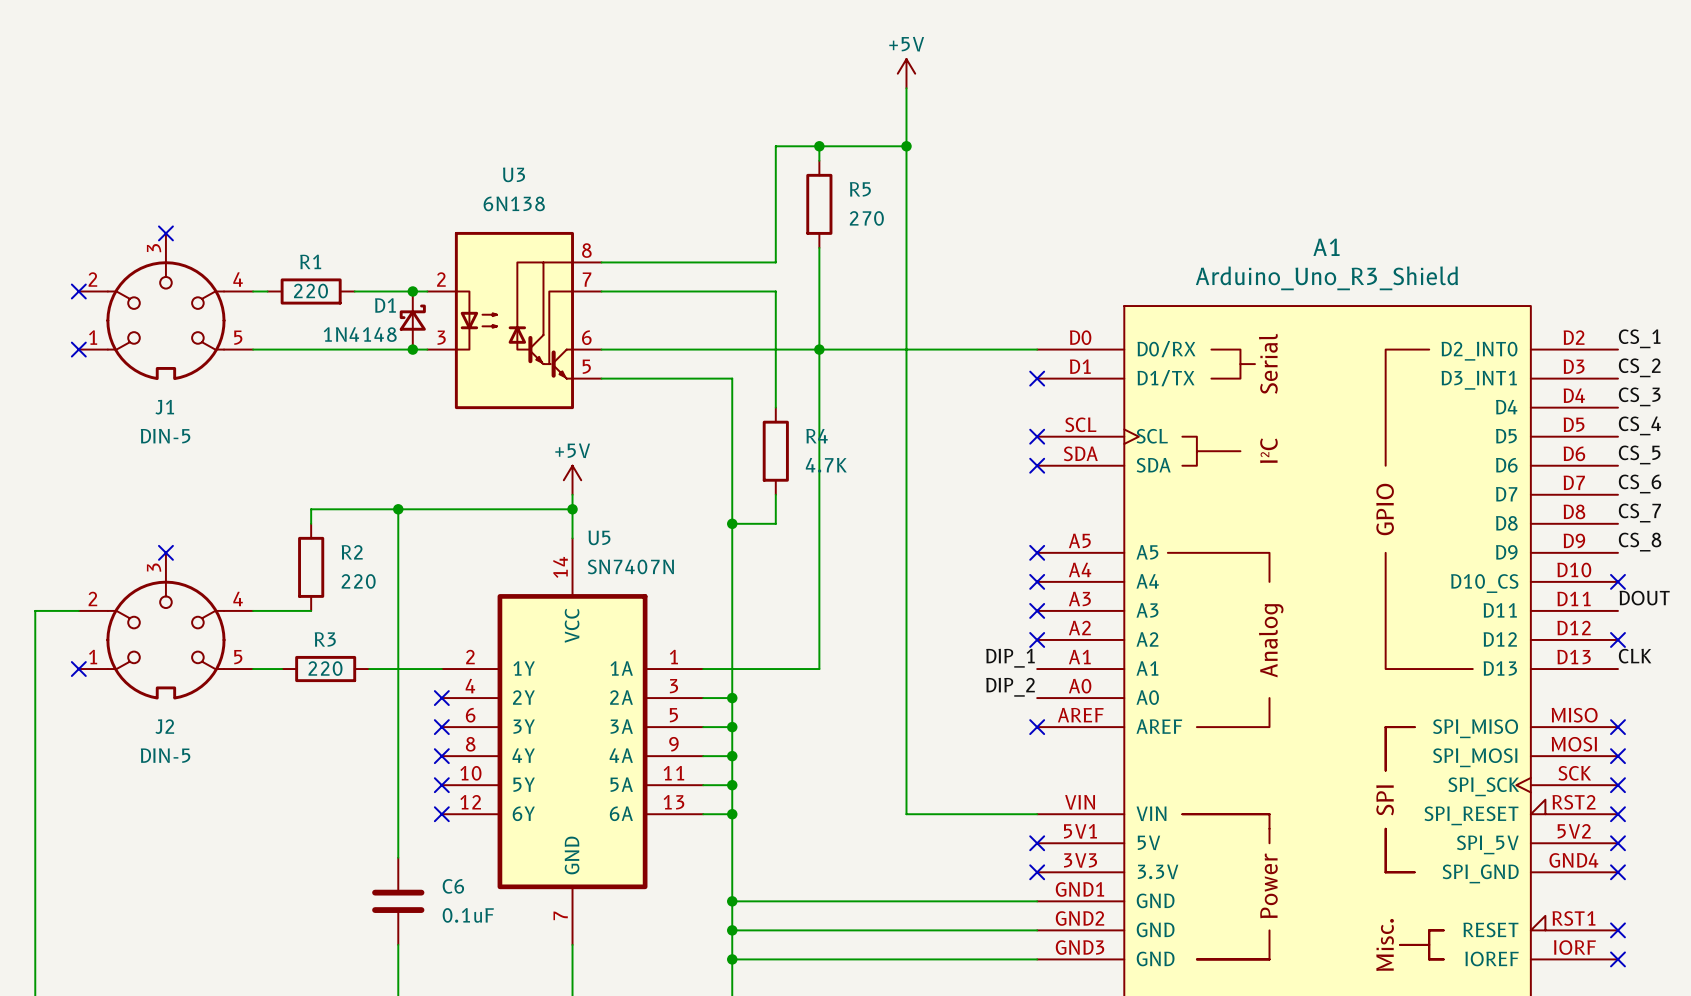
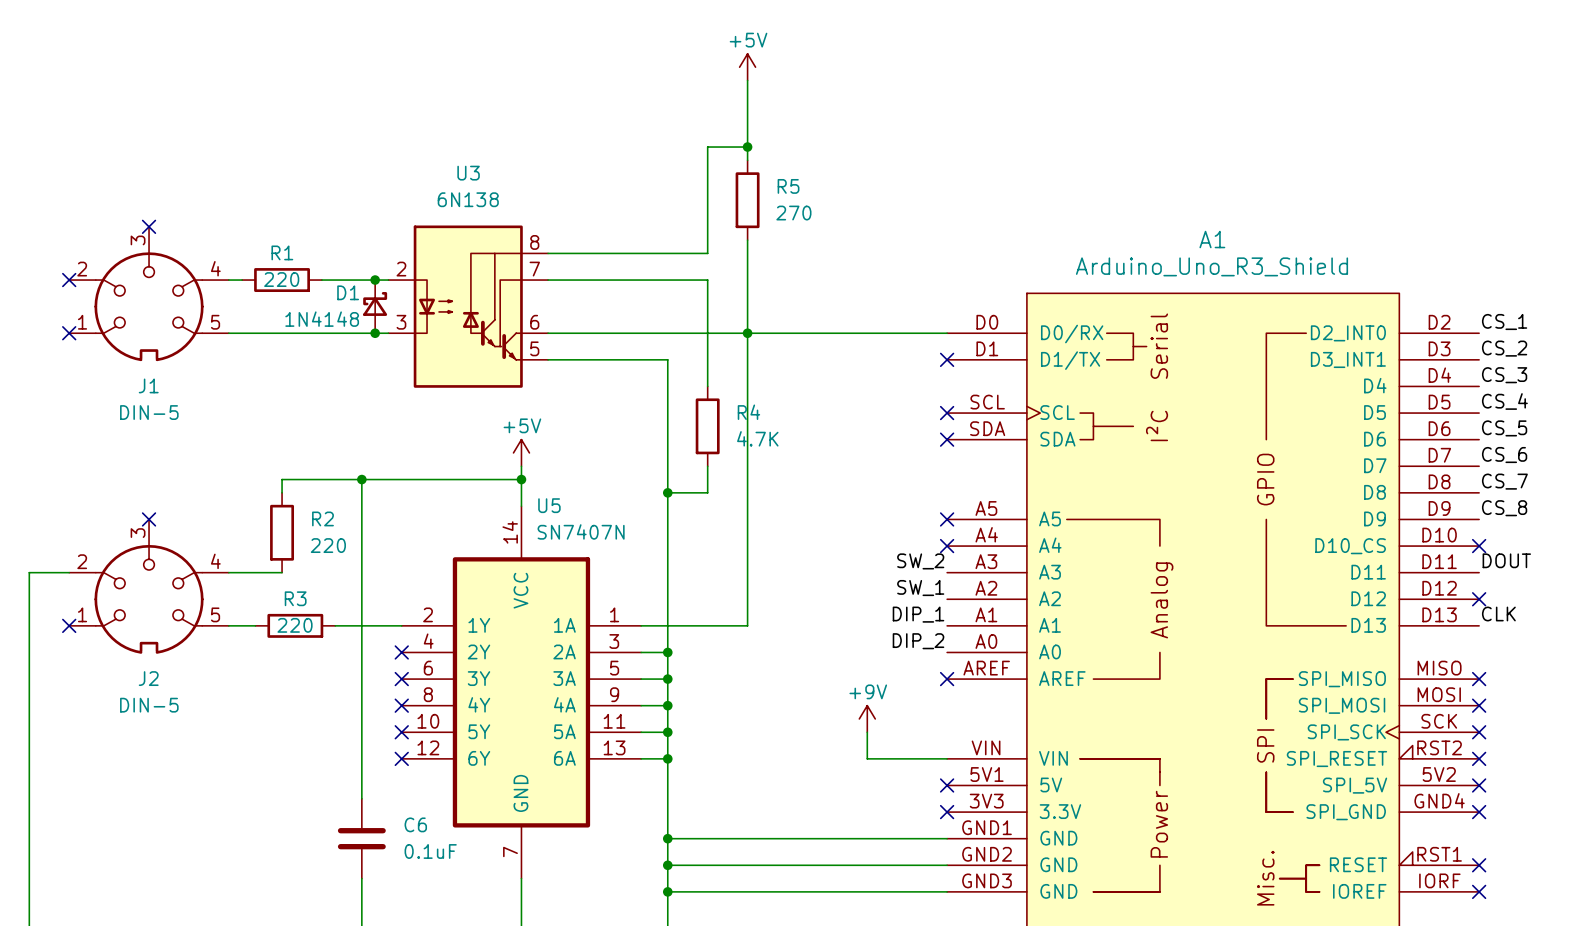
power symbol position: +5V (906, 73) -> +5V (747, 67)
wire: (906, 88) (906, 814) (950, 814) -> (867, 732) (867, 758)
wire: (819, 146) (906, 146) -> (747, 147) (747, 80)
junction: (906, 146) -> none
label: none -> SW_2 (920, 561)
no-connect mark: (1037, 610) -> none
label: none -> SW_1 (920, 588)
no-connect mark: (1037, 639) -> none
power symbol: none -> +9V (867, 718)

